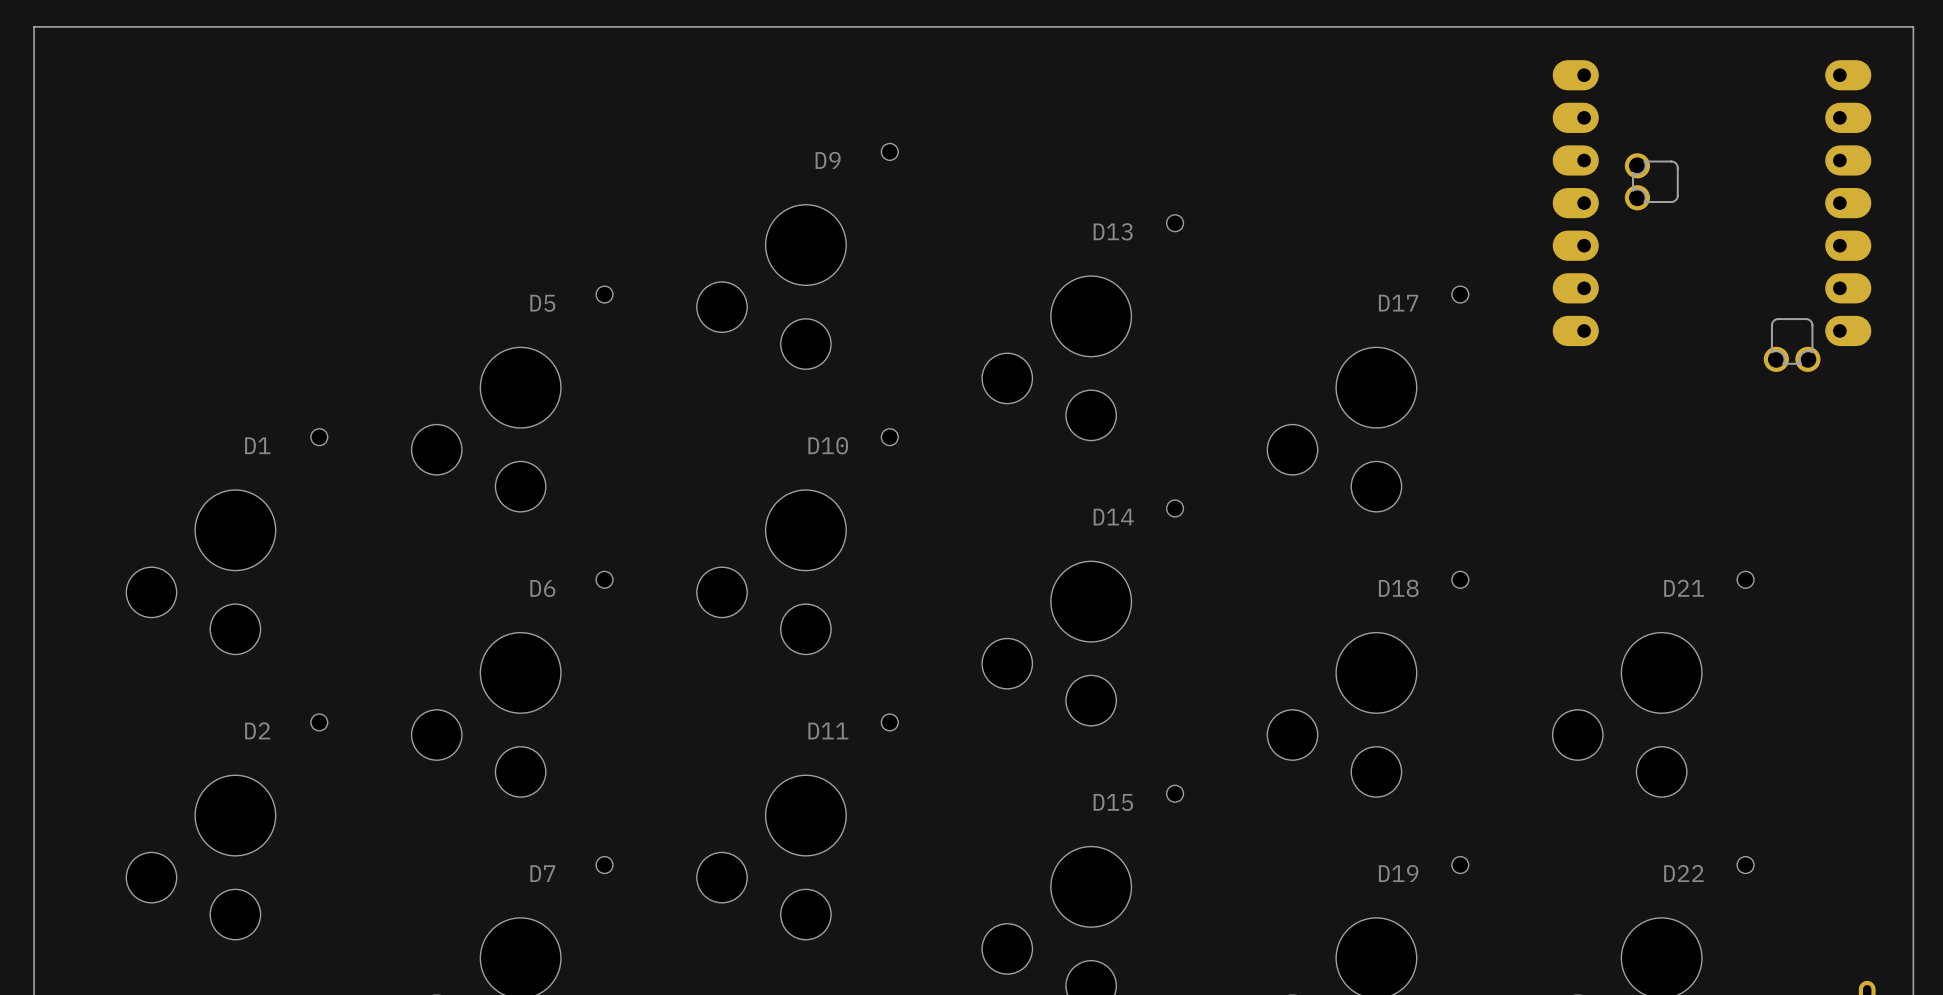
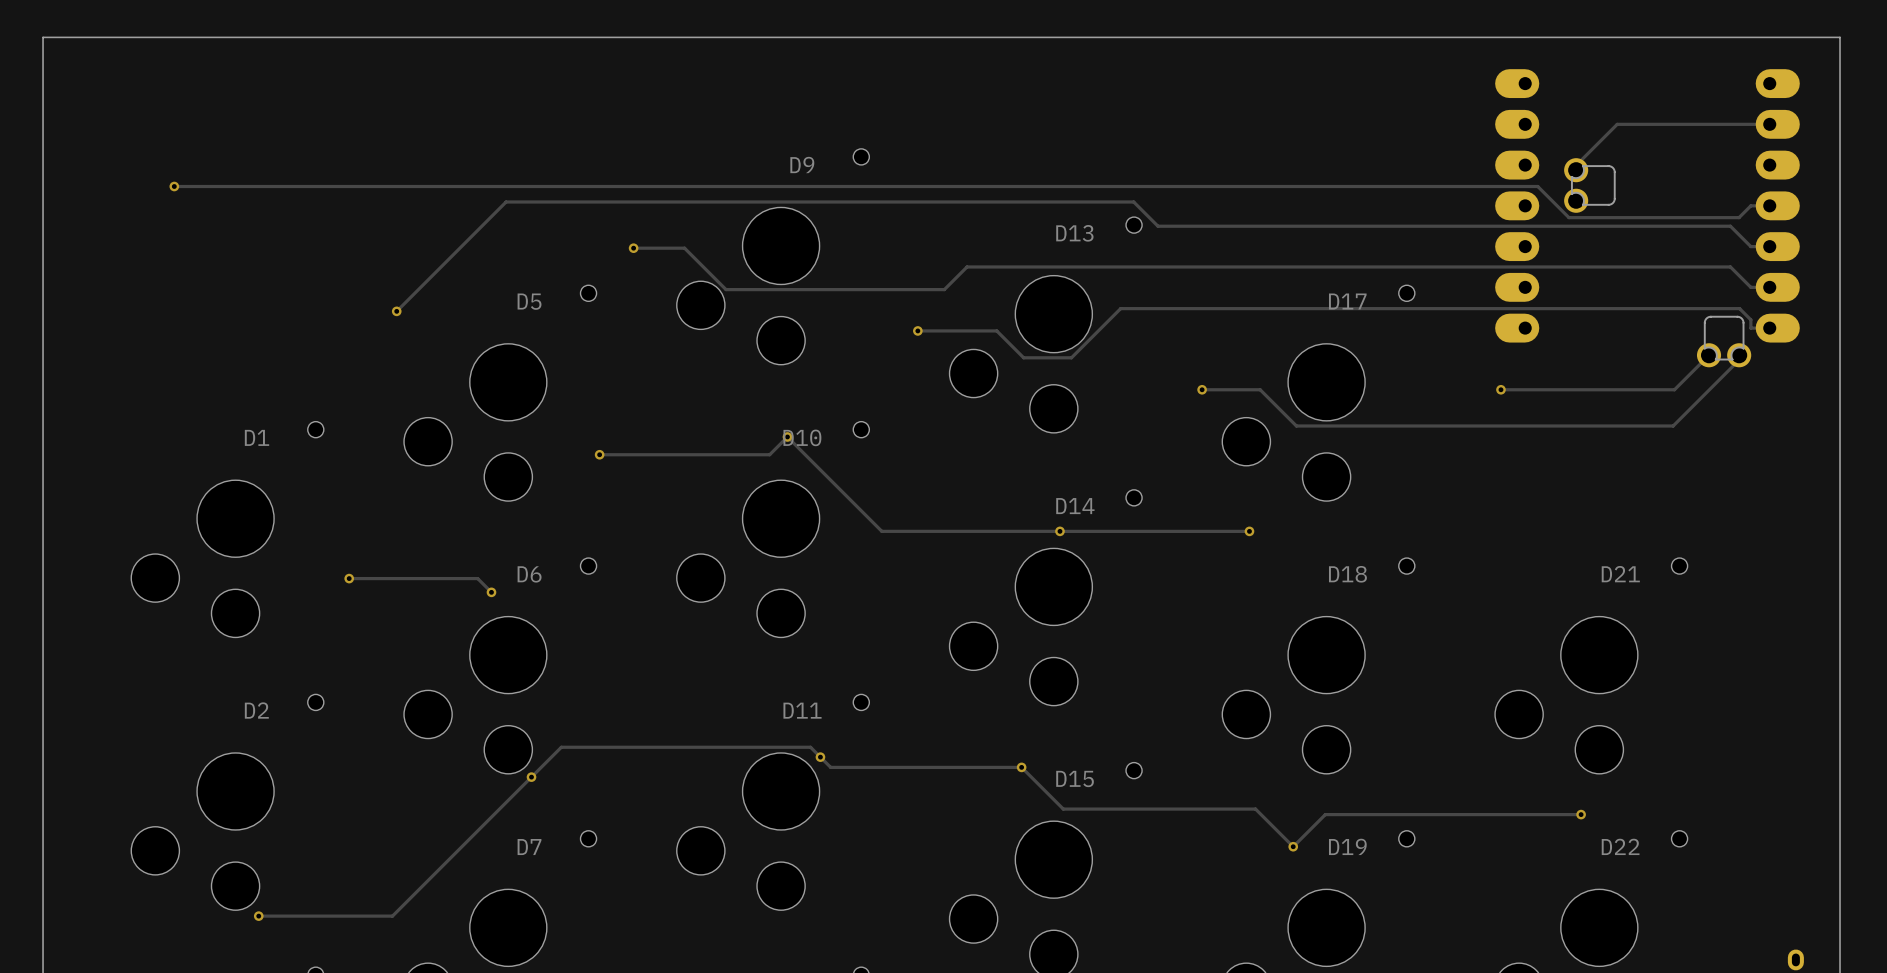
track: none -> (1769, 124) (1617, 124) (1576, 165) (1576, 170)
track: none -> (174, 186) (1537, 186) (1568, 217) (1739, 217) (1750, 205) (1769, 205)
via: none -> (174, 186)
track: none -> (1769, 246) (1750, 246) (1730, 226) (1157, 226) (1133, 202) (506, 202) (396, 311)
track: none -> (633, 248) (684, 248) (726, 289) (944, 289) (967, 266) (1730, 266) (1750, 287) (1769, 287)
via: none -> (633, 248)
via: none -> (396, 311)
track: none -> (1769, 328) (1750, 328) (1750, 319) (1739, 308) (1120, 308) (1071, 357) (1023, 357) (996, 330) (917, 330)
via: none -> (917, 330)
track: none -> (1709, 355) (1674, 389) (1500, 389)
track: none -> (1739, 355) (1739, 360) (1673, 425) (1296, 425) (1260, 389) (1202, 389)
via: none -> (1202, 389)
via: none -> (1500, 389)
via: none -> (787, 436)
track: none -> (599, 454) (769, 454) (787, 436) (881, 531) (1249, 531)
via: none -> (599, 454)
via: none -> (1059, 531)
via: none -> (1249, 531)
track: none -> (349, 578) (477, 578) (491, 592)
via: none -> (349, 578)
via: none -> (491, 592)
via: none -> (820, 757)
via: none -> (1021, 767)
via: none -> (531, 777)
track: none -> (1581, 814) (1325, 814) (1293, 846) (1255, 809) (1063, 809) (1021, 767) (830, 767) (810, 747) (561, 747) (392, 916) (258, 916)
via: none -> (1581, 814)
via: none -> (1293, 846)
via: none -> (258, 916)

